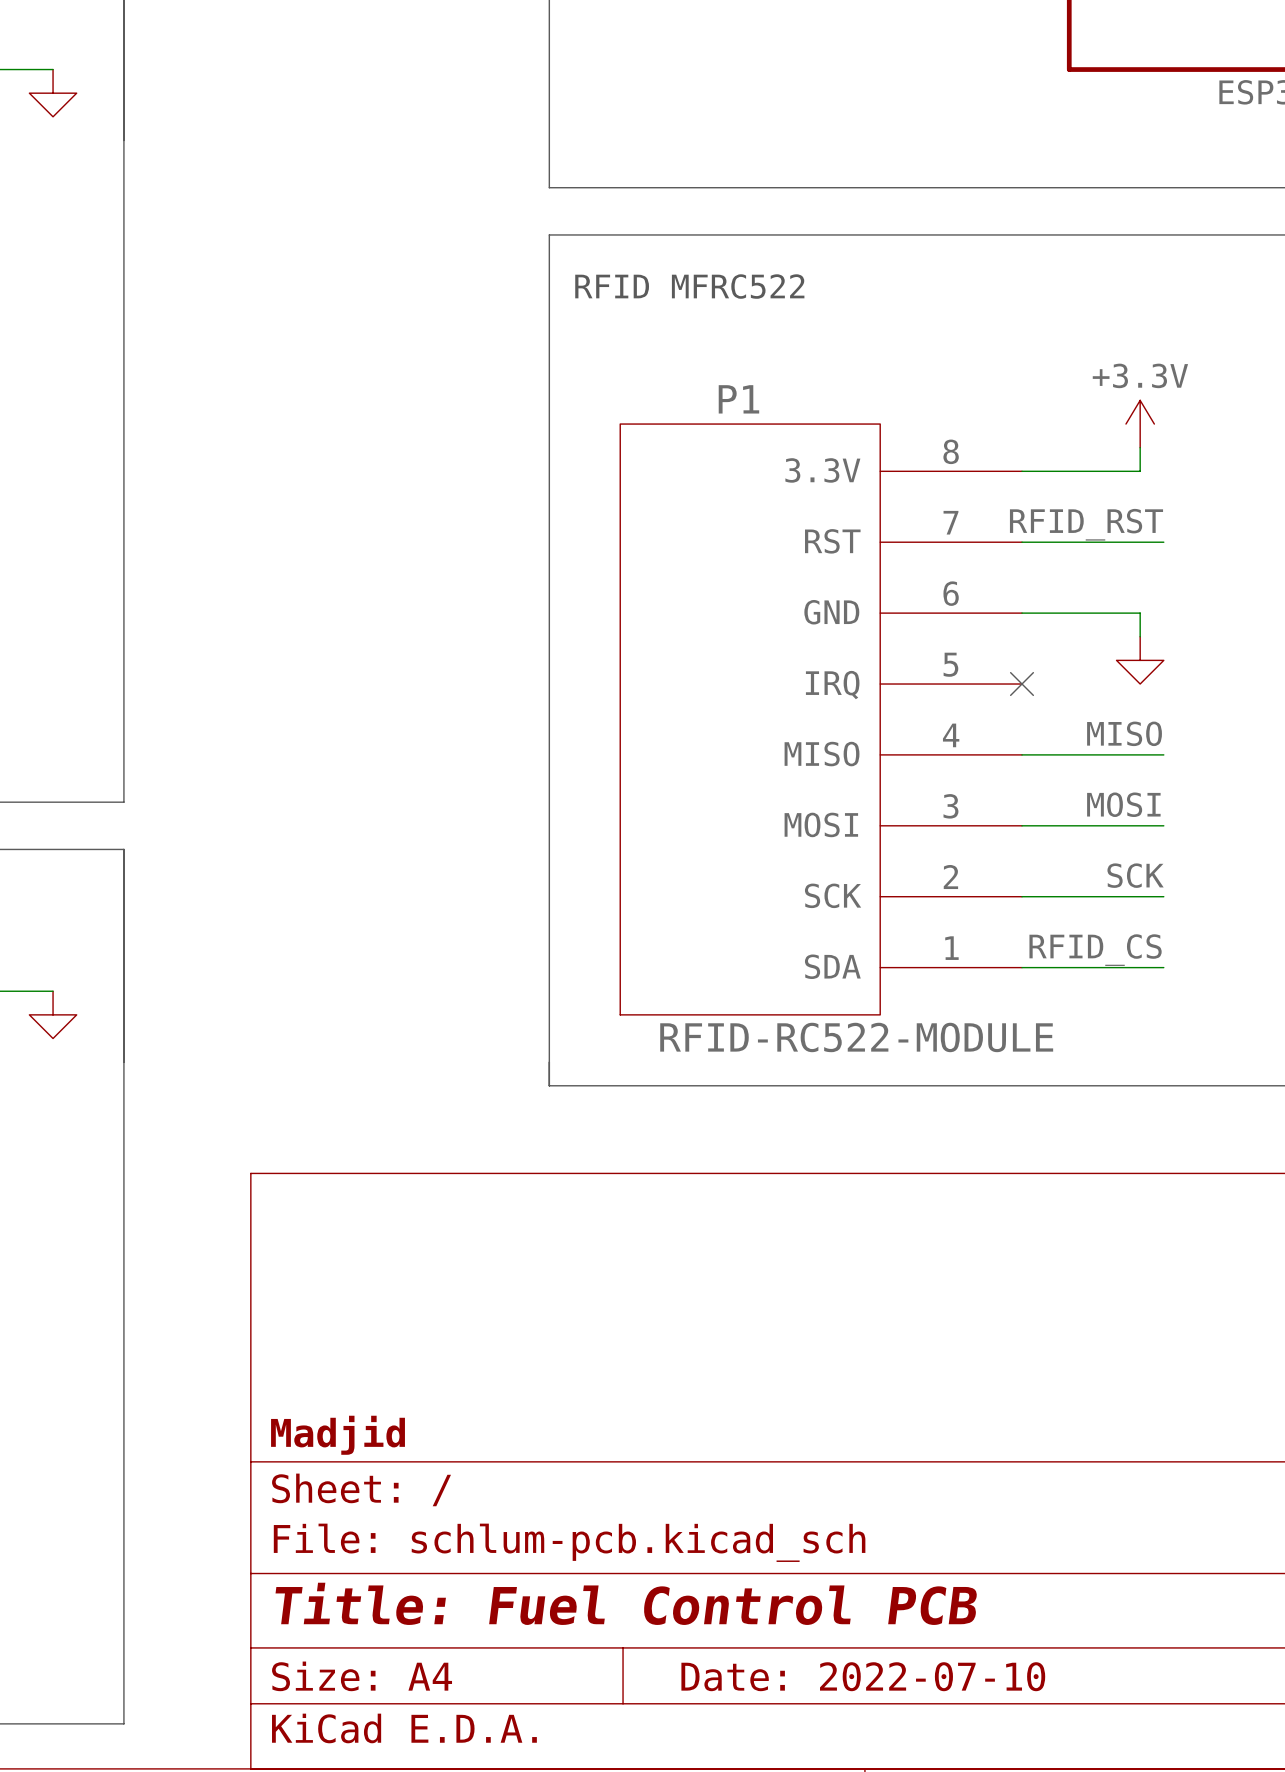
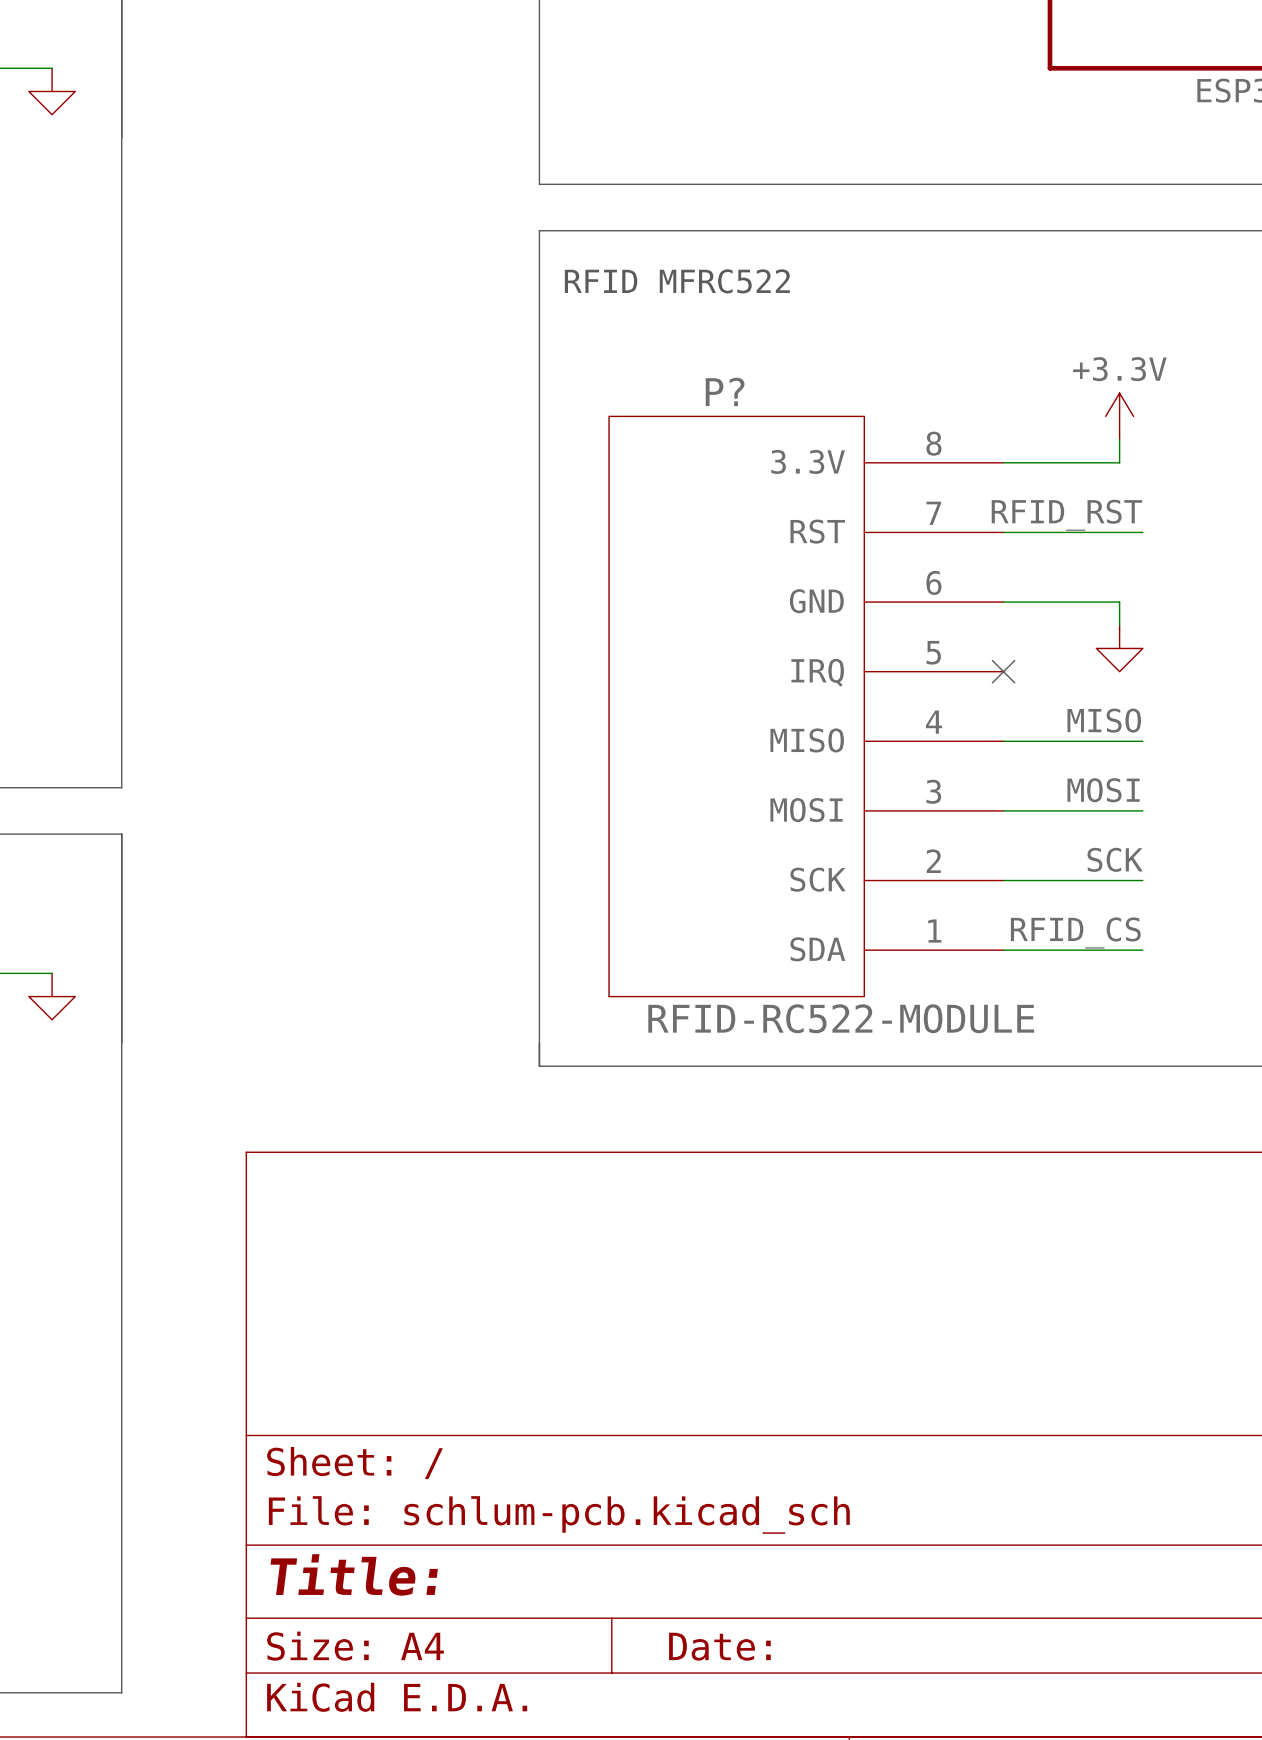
P1 name: P1 (738, 399) -> P? (725, 391)
title block: Madjid (338, 1435) -> none
title block: Title: Fuel Control PCB (626, 1603) -> Title: (354, 1574)
title block: Date: 2022-07-10 (863, 1676) -> Date: (719, 1646)

